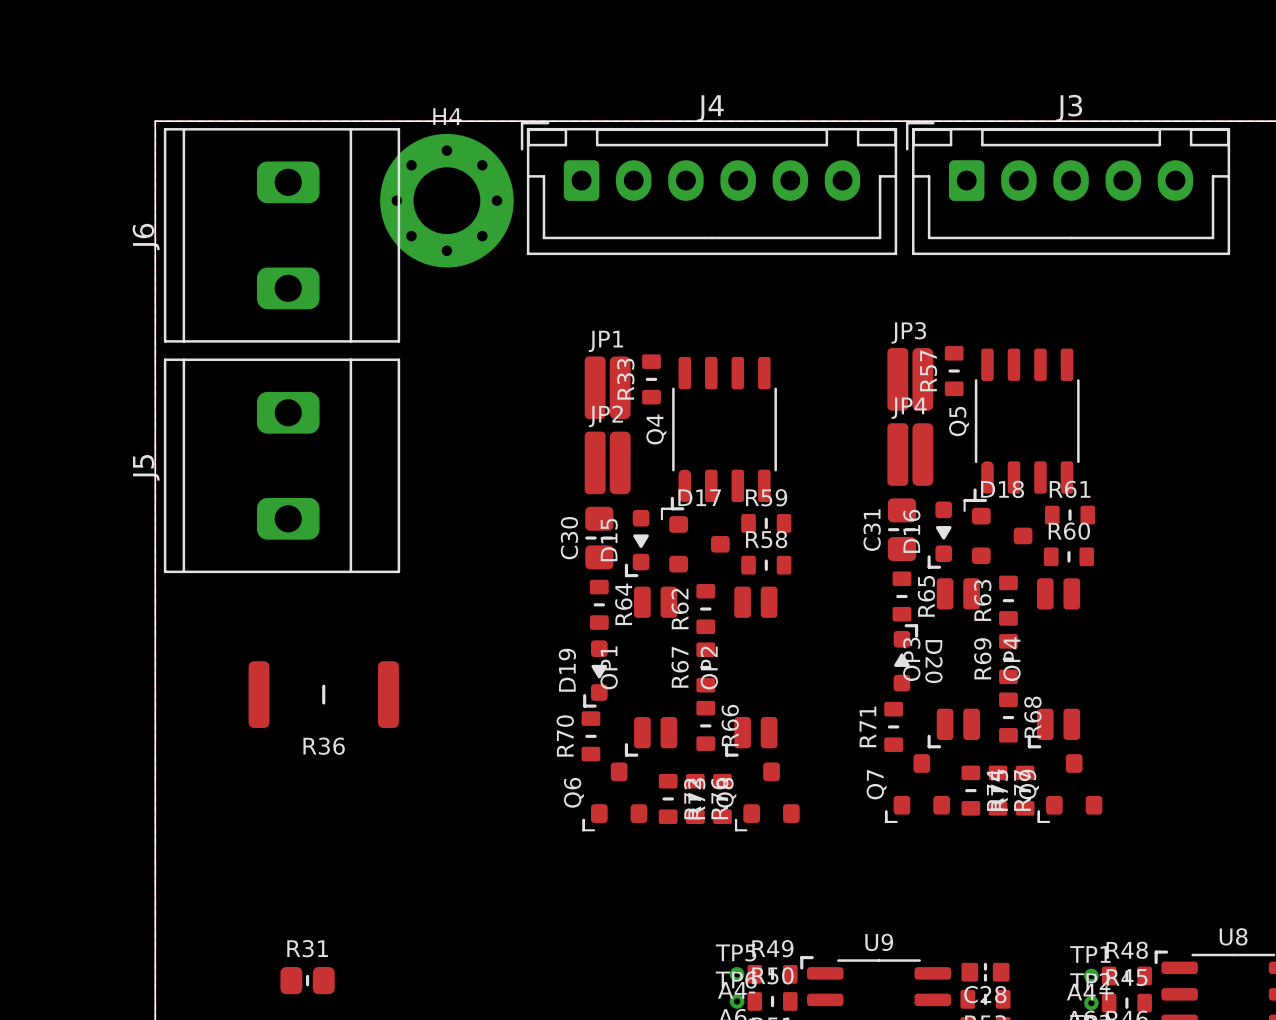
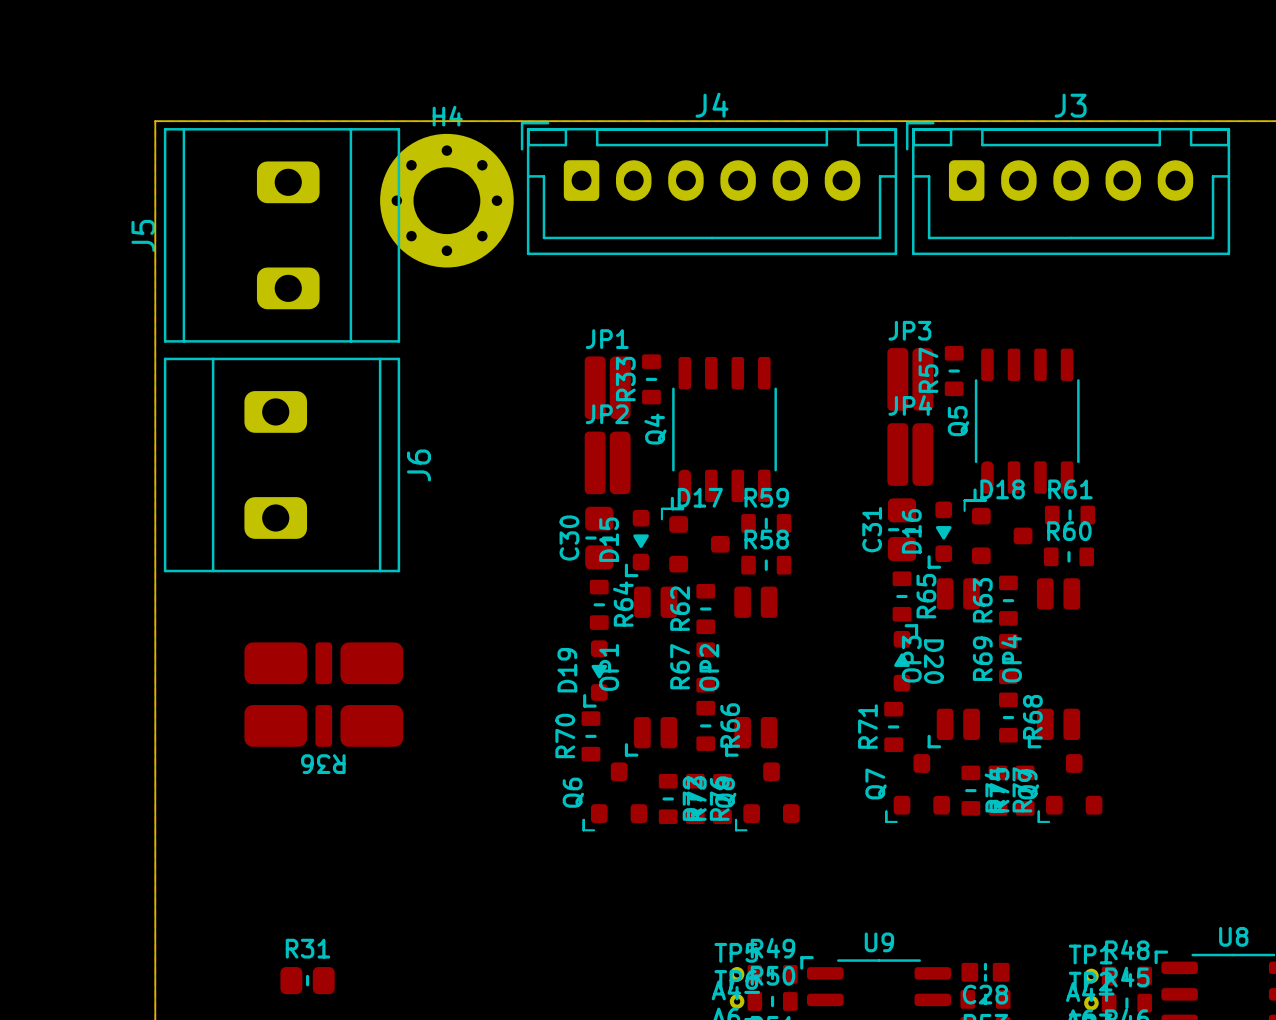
J6 name: J6 (146, 236) -> J5 (143, 235)
J6: none -> (282, 464)
J5: (282, 465) -> none
R36 footprint: [248, 661, 399, 728] -> [244, 642, 404, 747]

